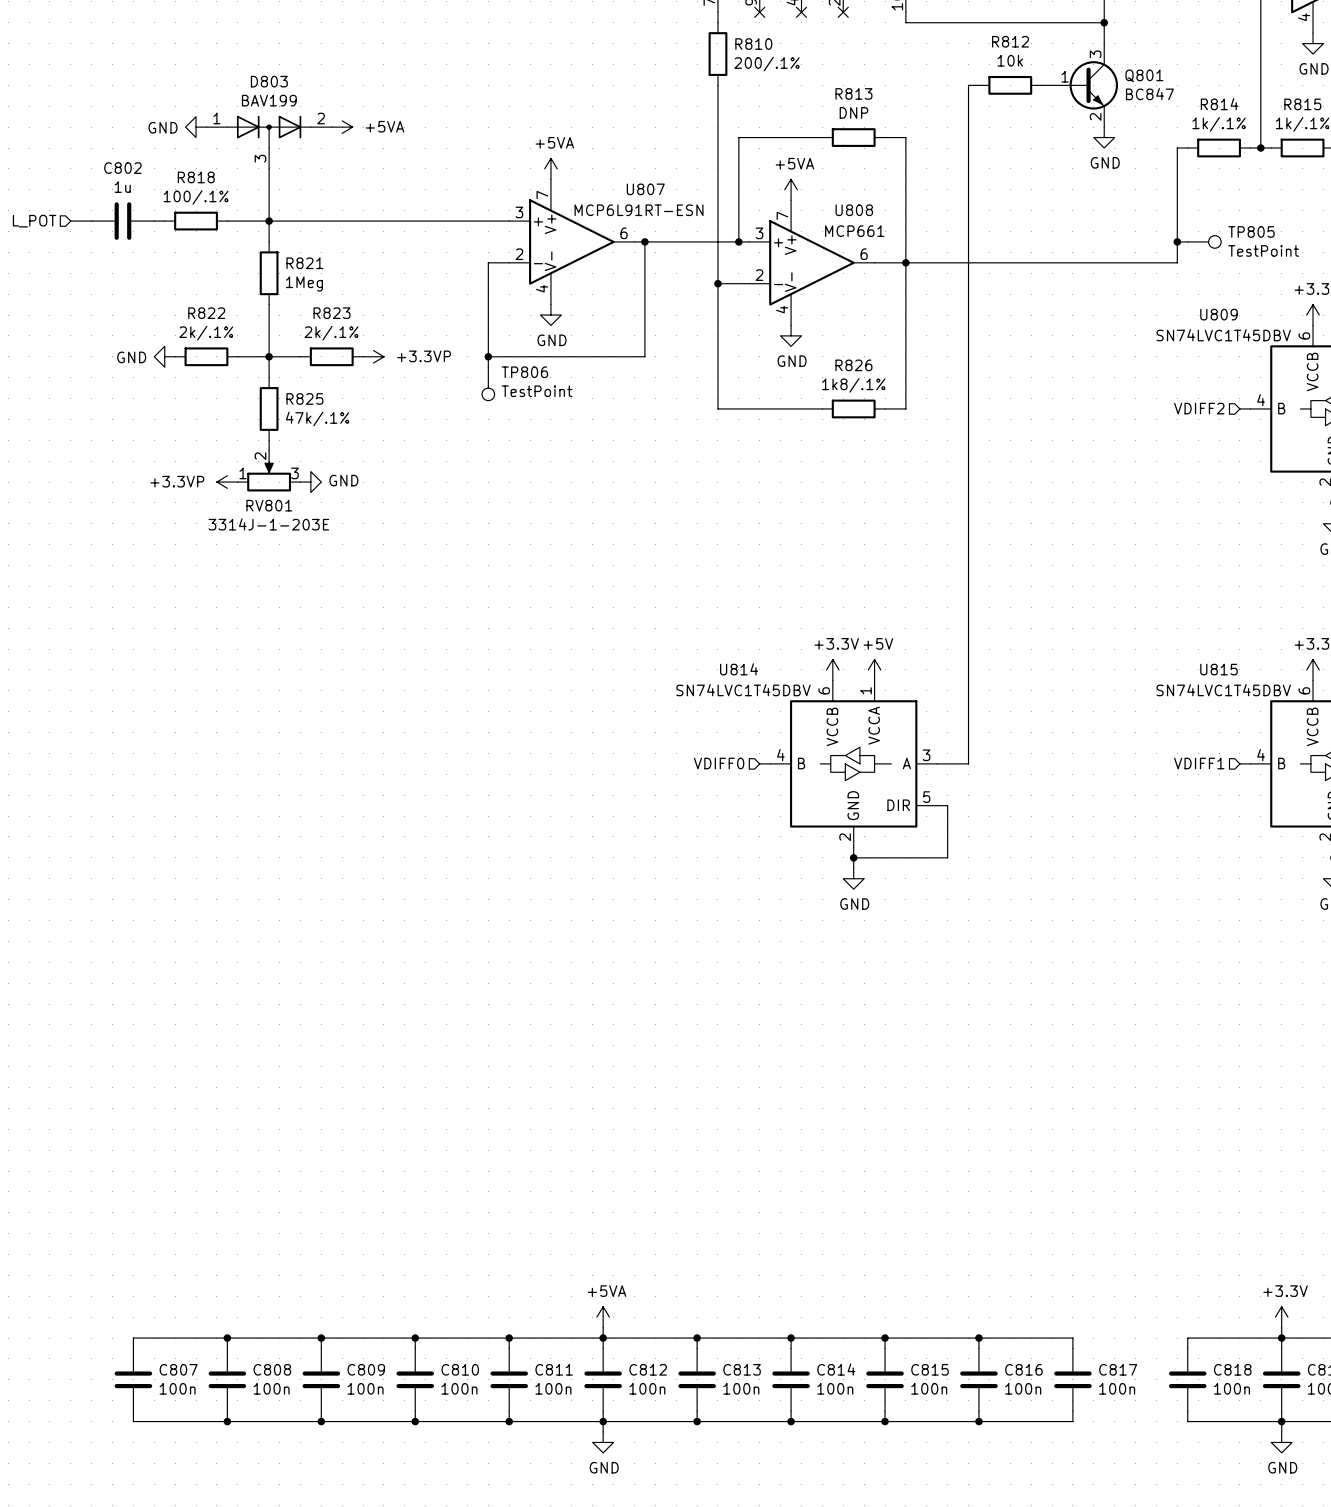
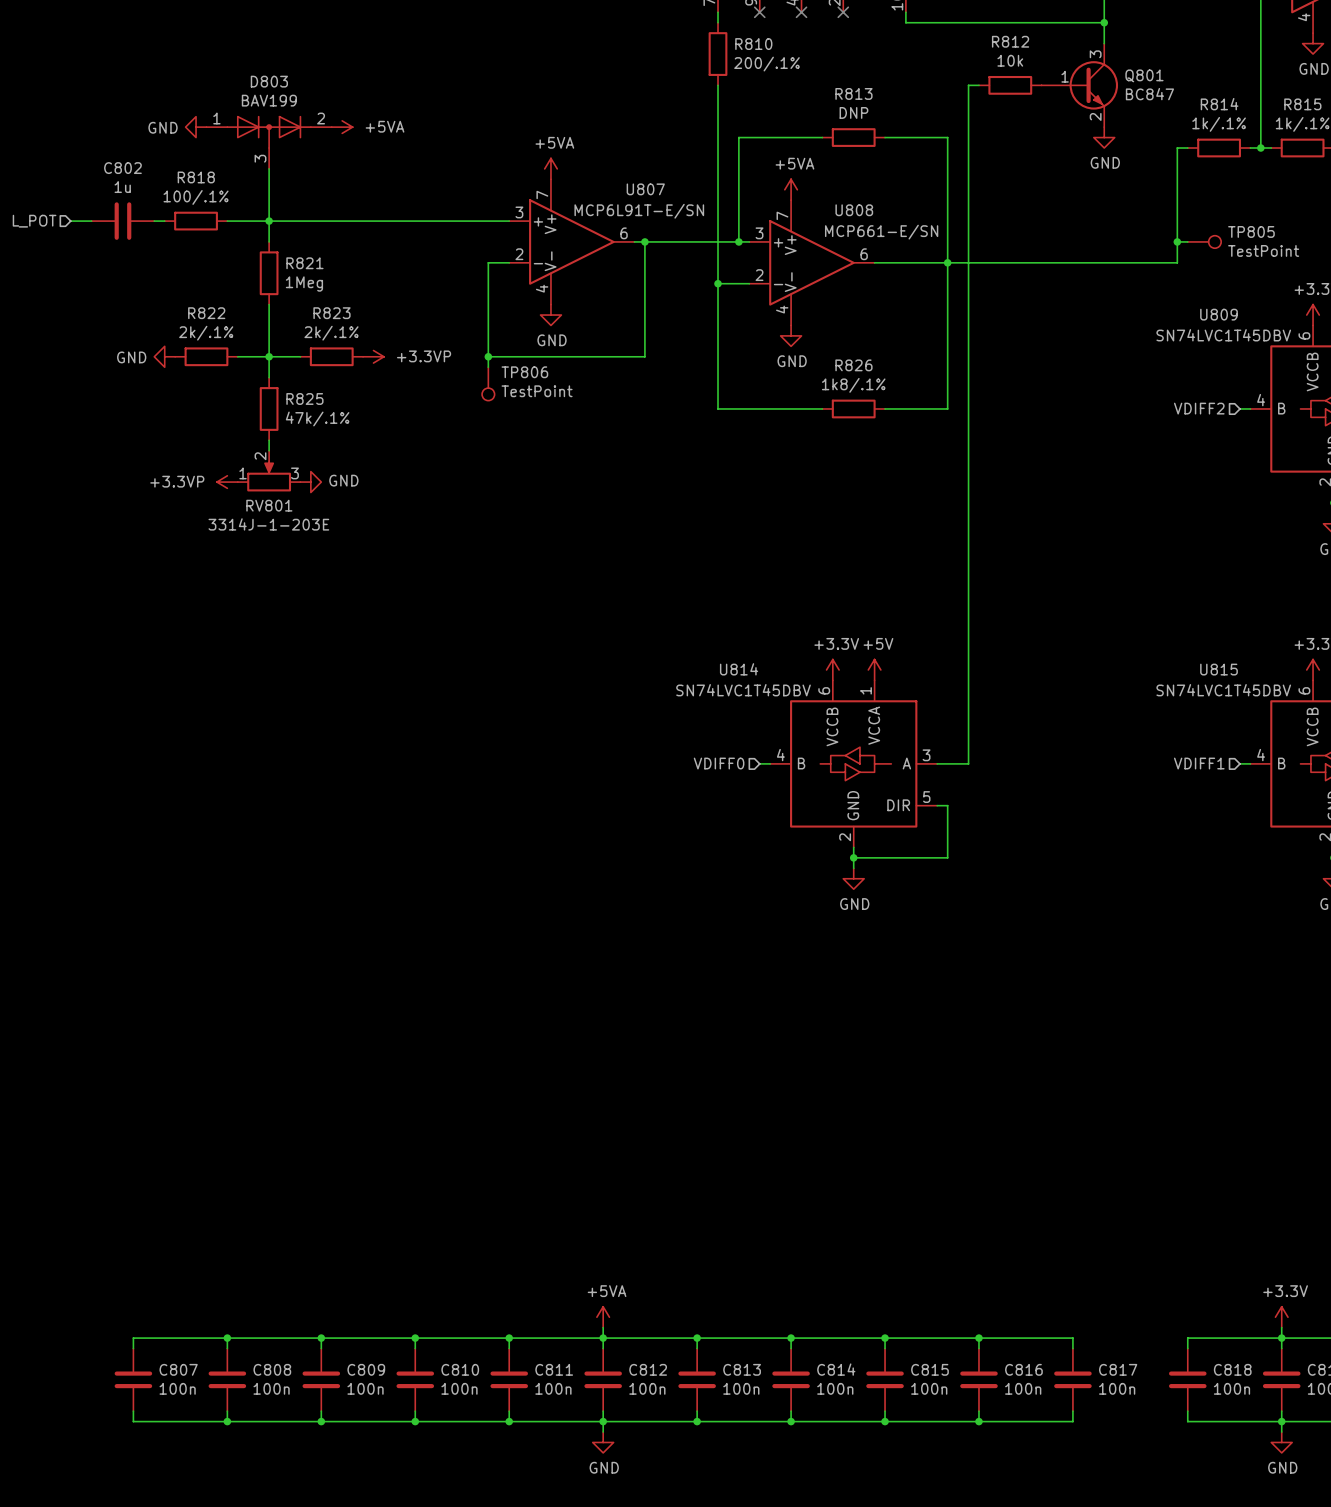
wire: (905, 137) (905, 408) -> (905, 137) (947, 137) (947, 408) (905, 408)
U807 value: MCP6L91RT-ESN (639, 210) -> MCP6L91T-E/SN (639, 211)
U808 value: MCP661 (854, 231) -> MCP661-E/SN (881, 232)
junction position: (905, 262) -> (947, 262)

